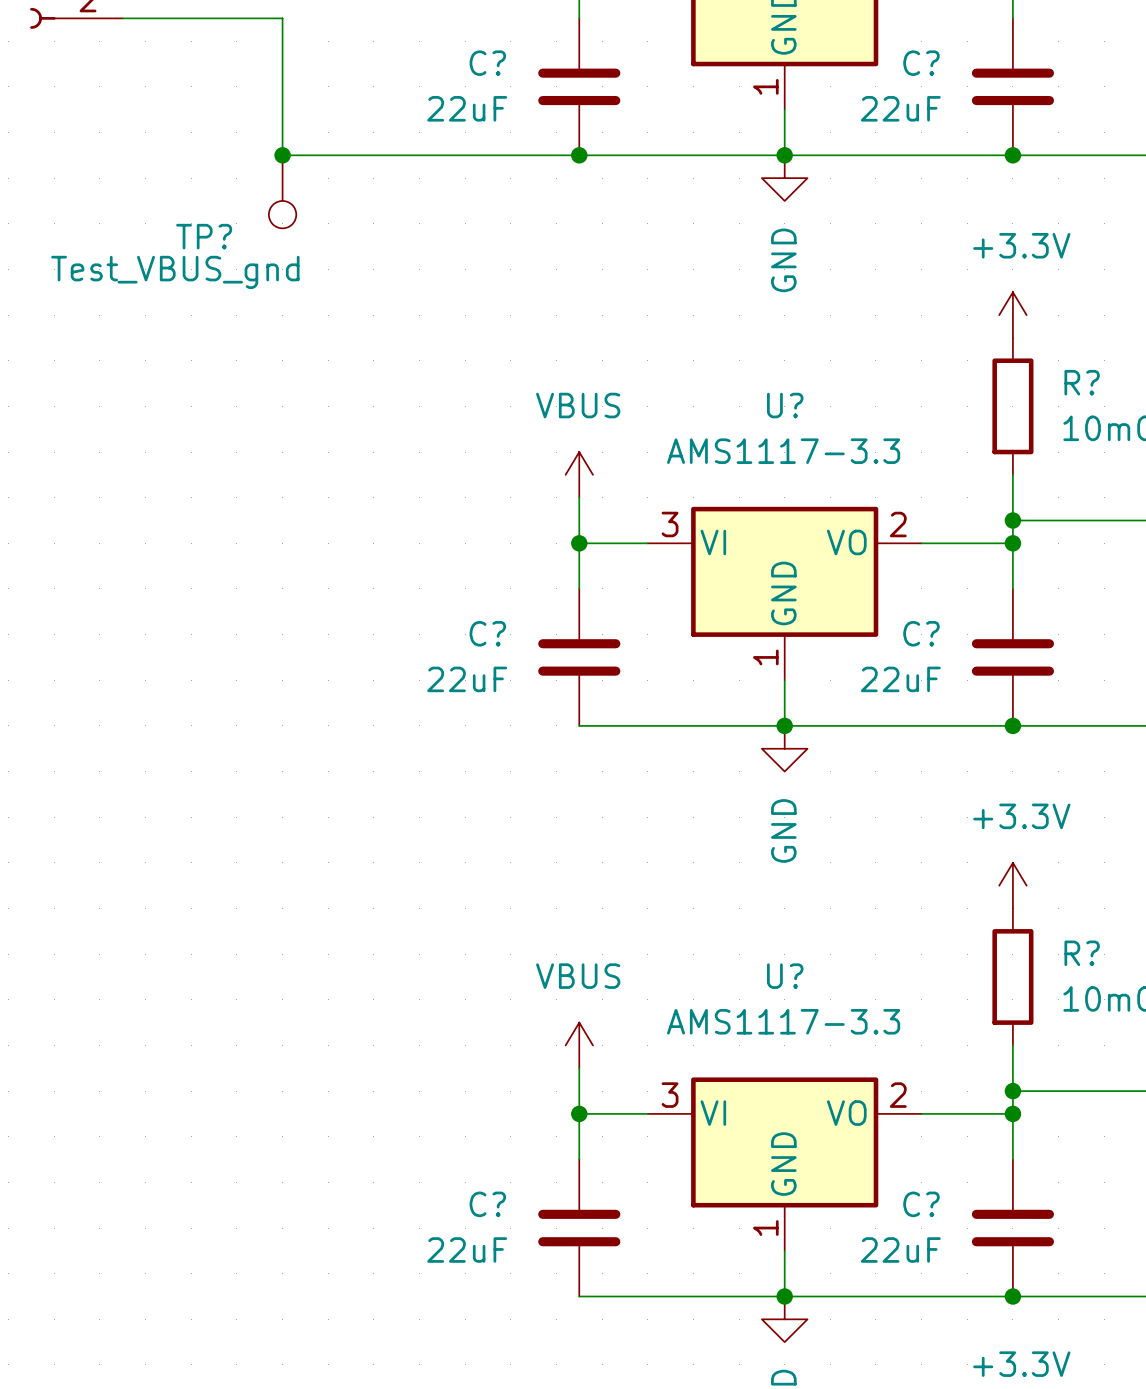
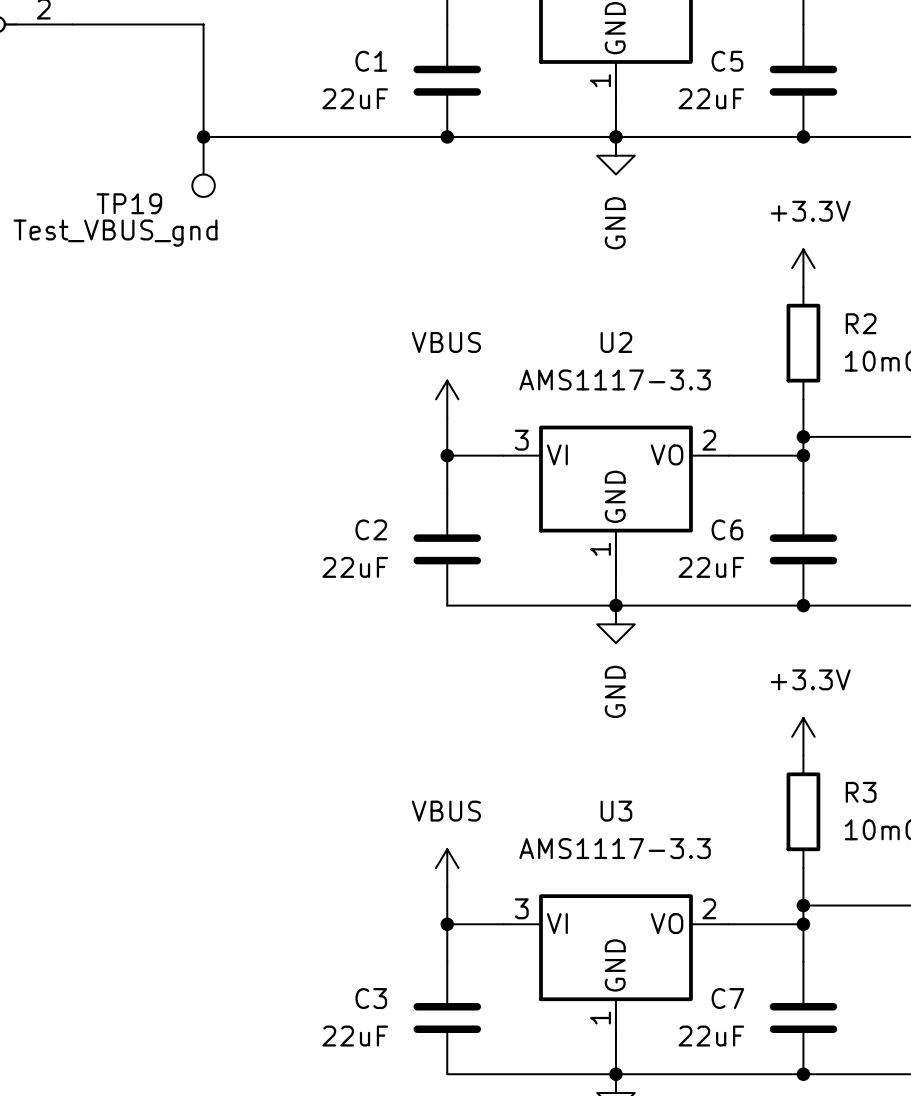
C? name: C? (487, 63) -> C1 (371, 61)
C? name: C? (921, 63) -> C5 (727, 61)
TP? name: TP? (204, 236) -> TP19 (129, 203)
R? name: R? (1082, 382) -> R2 (861, 323)
U? name: U? (785, 405) -> U2 (616, 342)
C? name: C? (487, 633) -> C2 (371, 529)
C? name: C? (921, 633) -> C6 (727, 529)
R? name: R? (1082, 953) -> R3 (861, 792)
U? name: U? (785, 976) -> U3 (616, 811)
C? name: C? (487, 1204) -> C3 (371, 998)
C? name: C? (921, 1204) -> C7 (727, 998)

